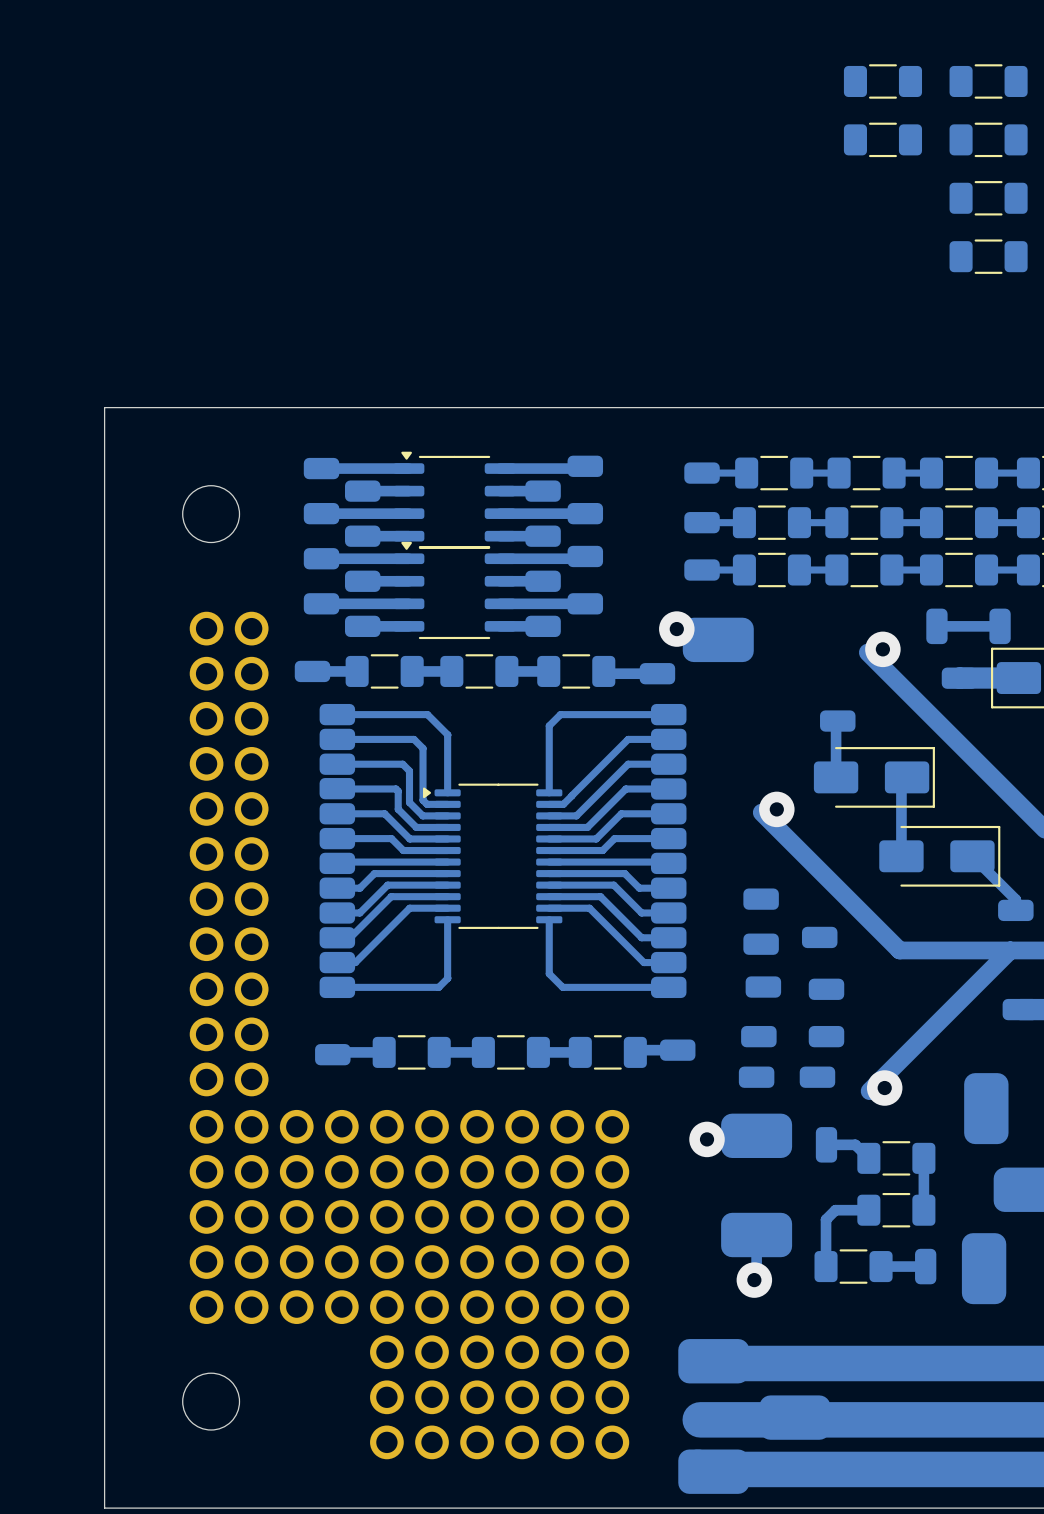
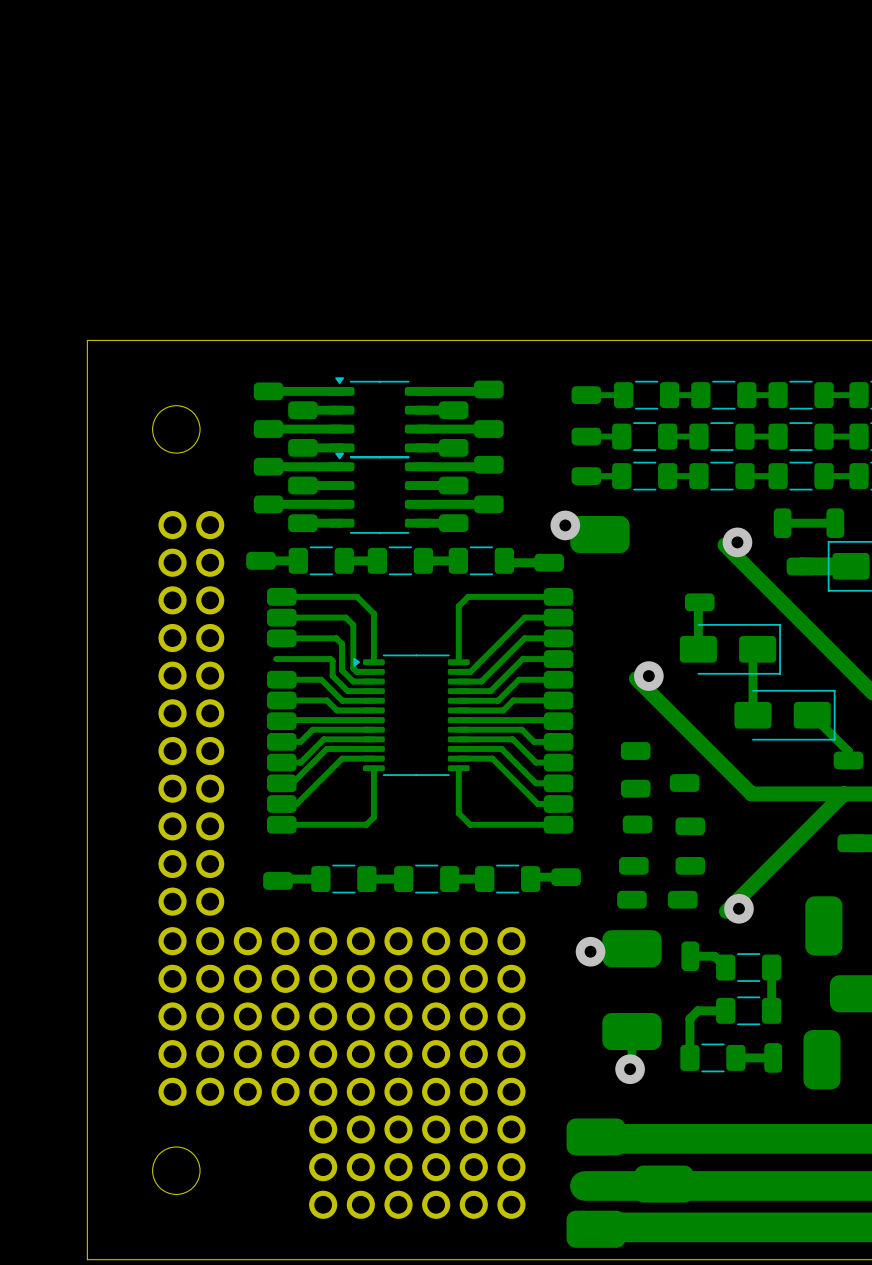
part: (882, 81) -> none
part: (988, 81) -> none
part: (882, 139) -> none
part: (988, 139) -> none
part: (988, 198) -> none
part: (988, 256) -> none
part: (337, 788) -> none

